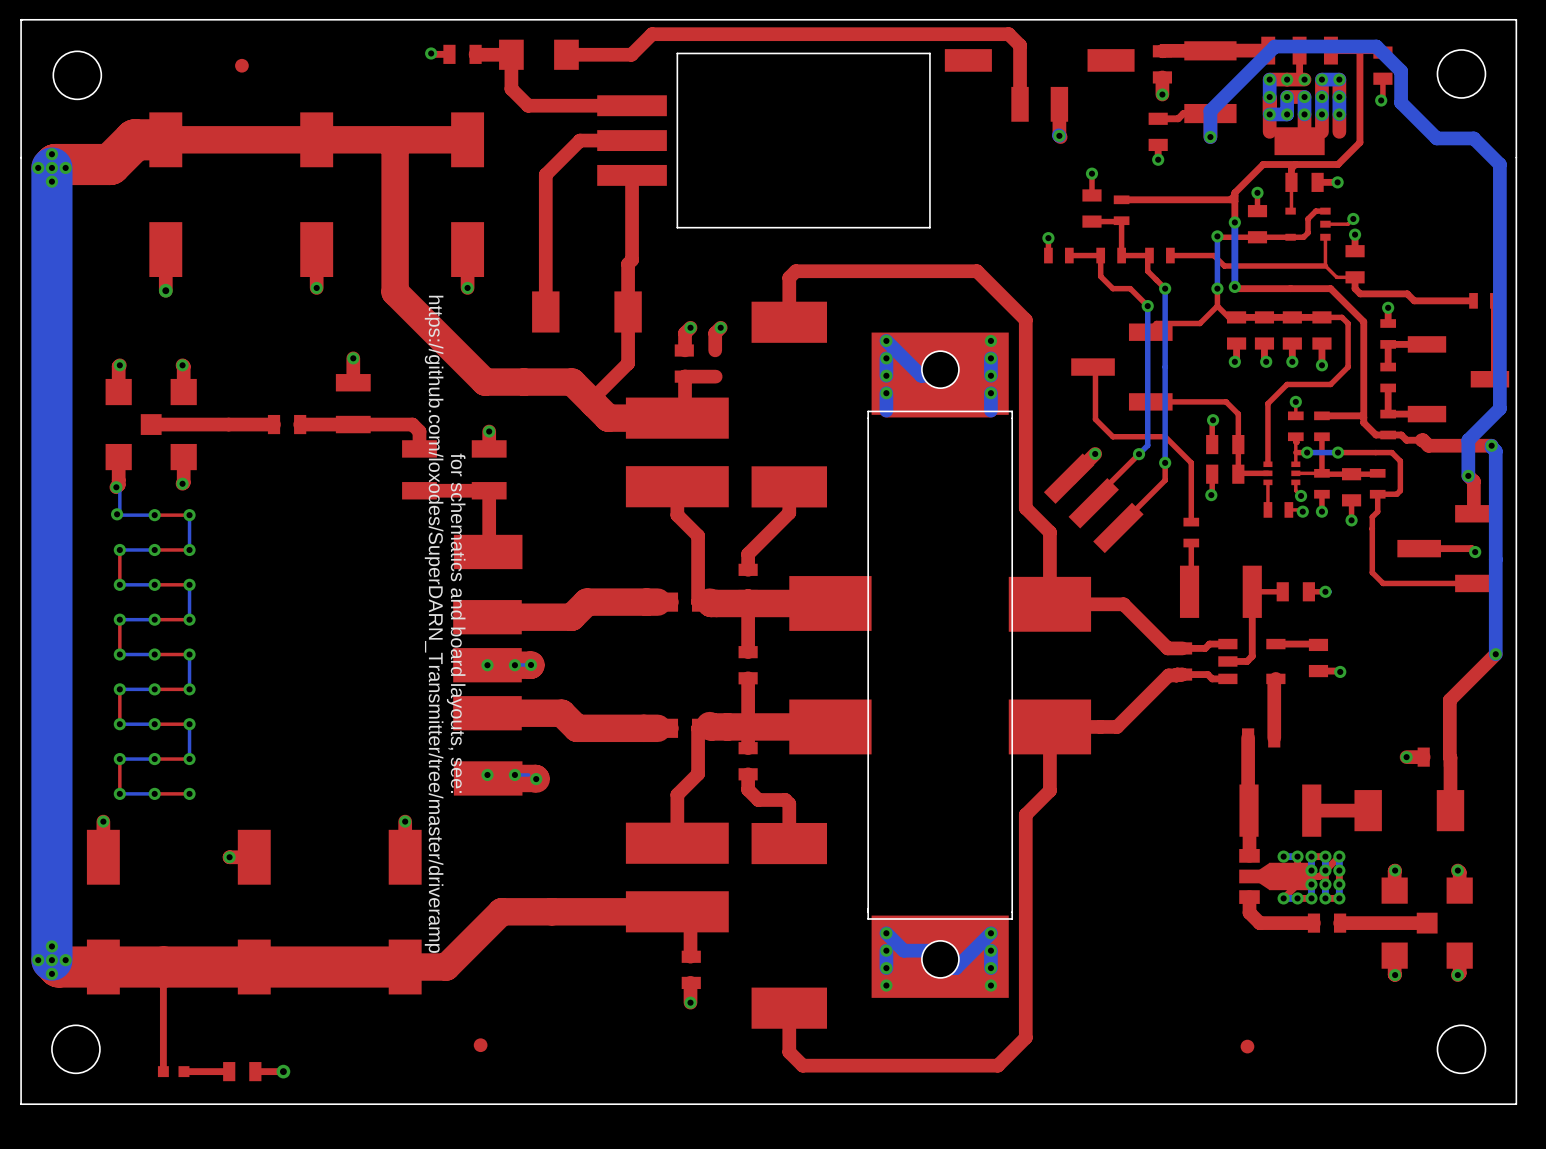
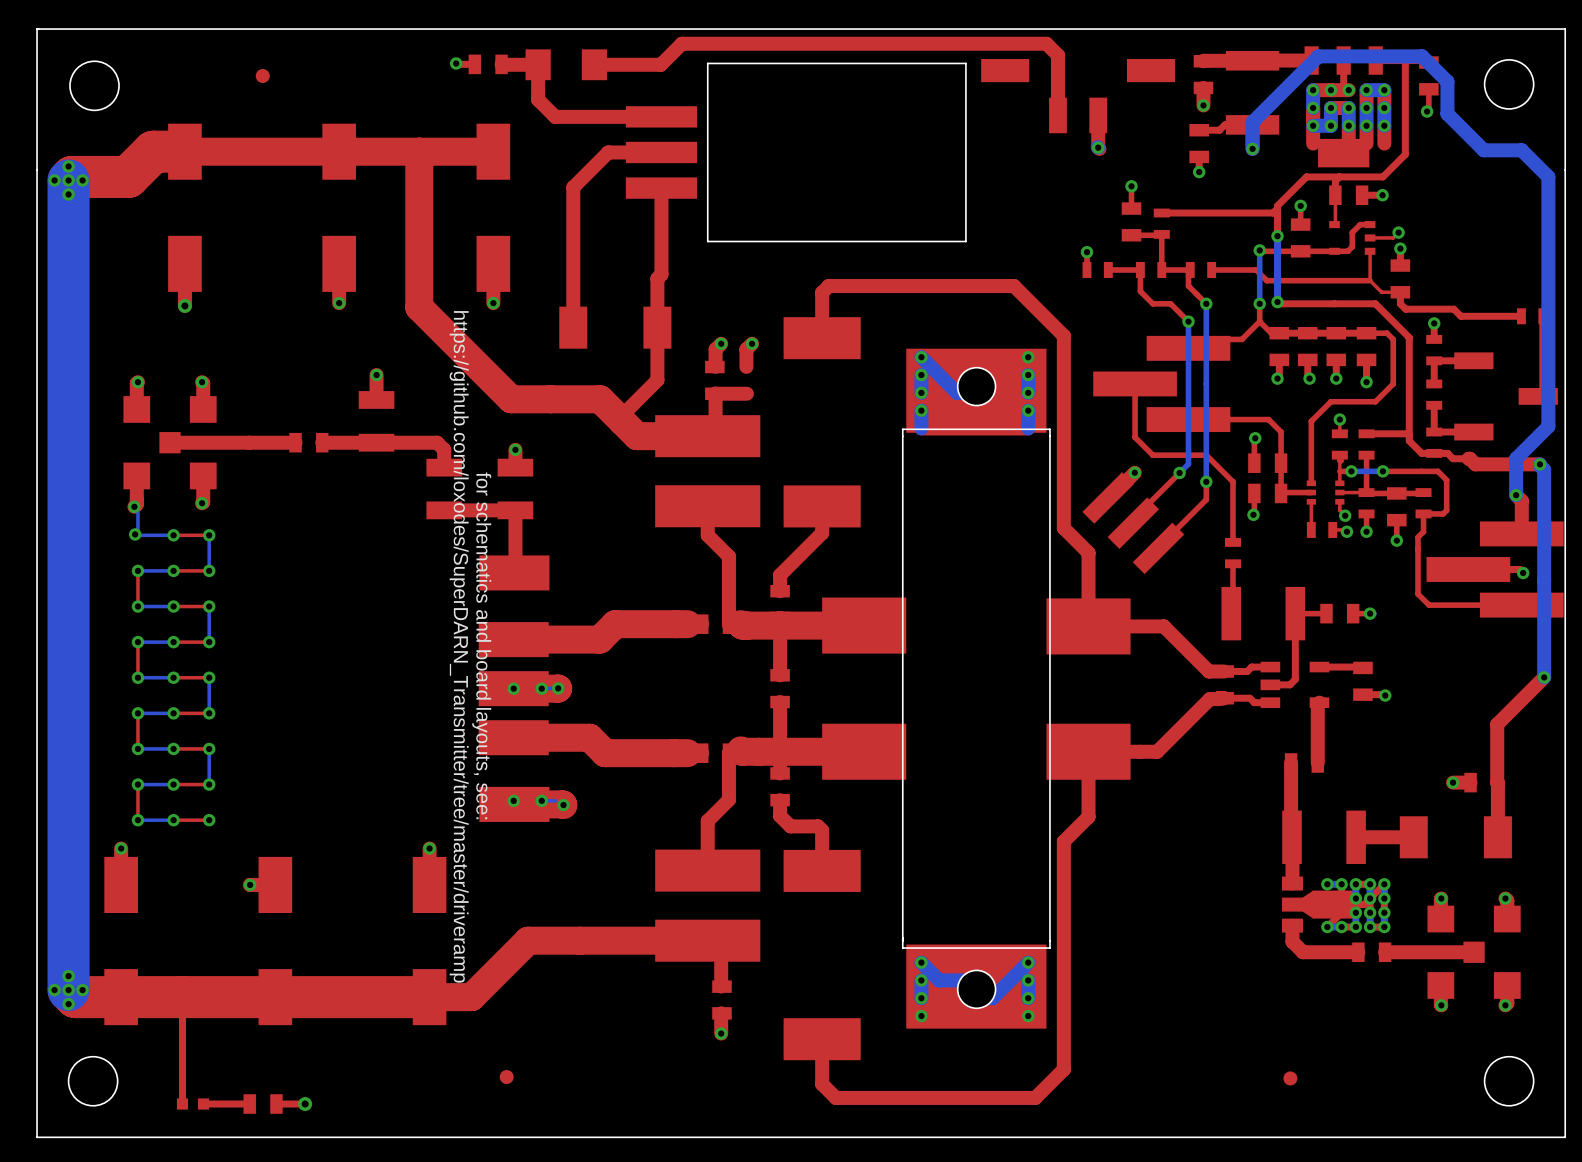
part footprint: [1071, 323, 1173, 411] -> [1093, 335, 1231, 433]
part footprint: [1397, 505, 1499, 593] -> [1426, 521, 1564, 618]

